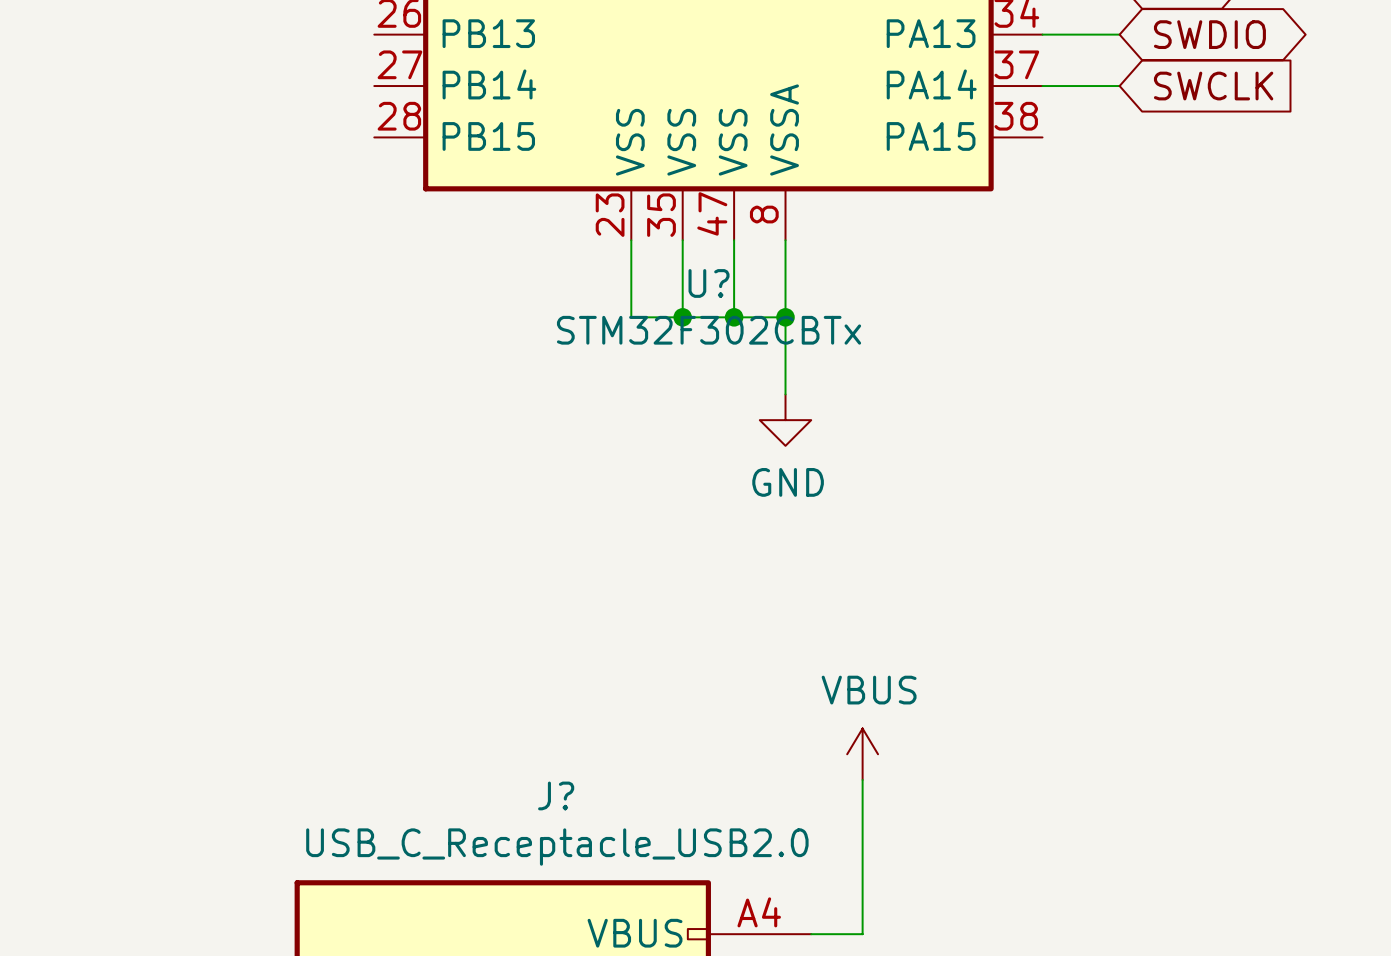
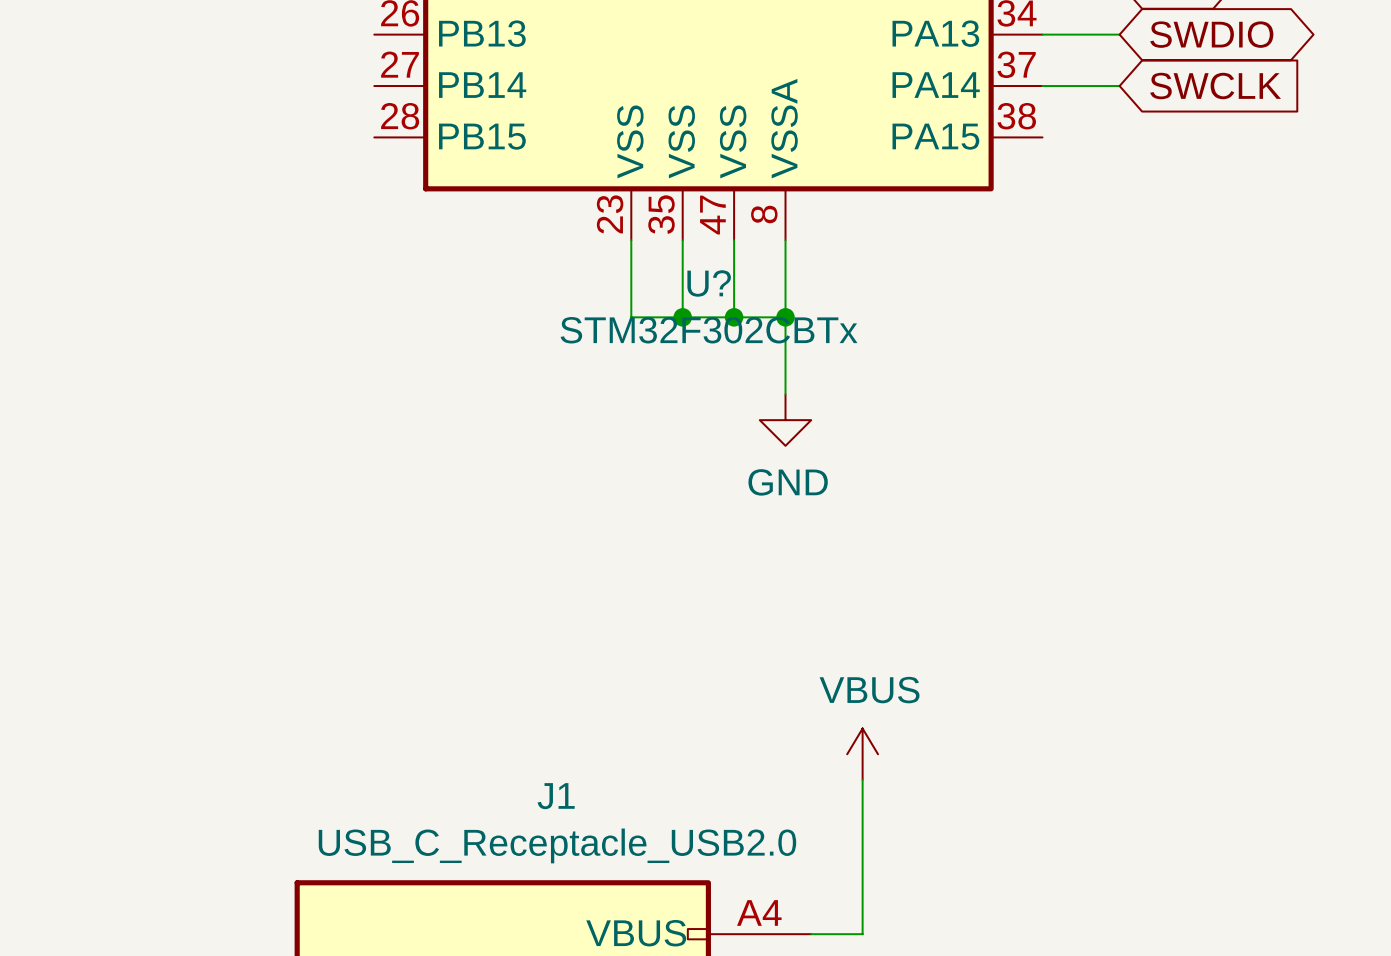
J? name: J? (556, 795) -> J1 (556, 796)

